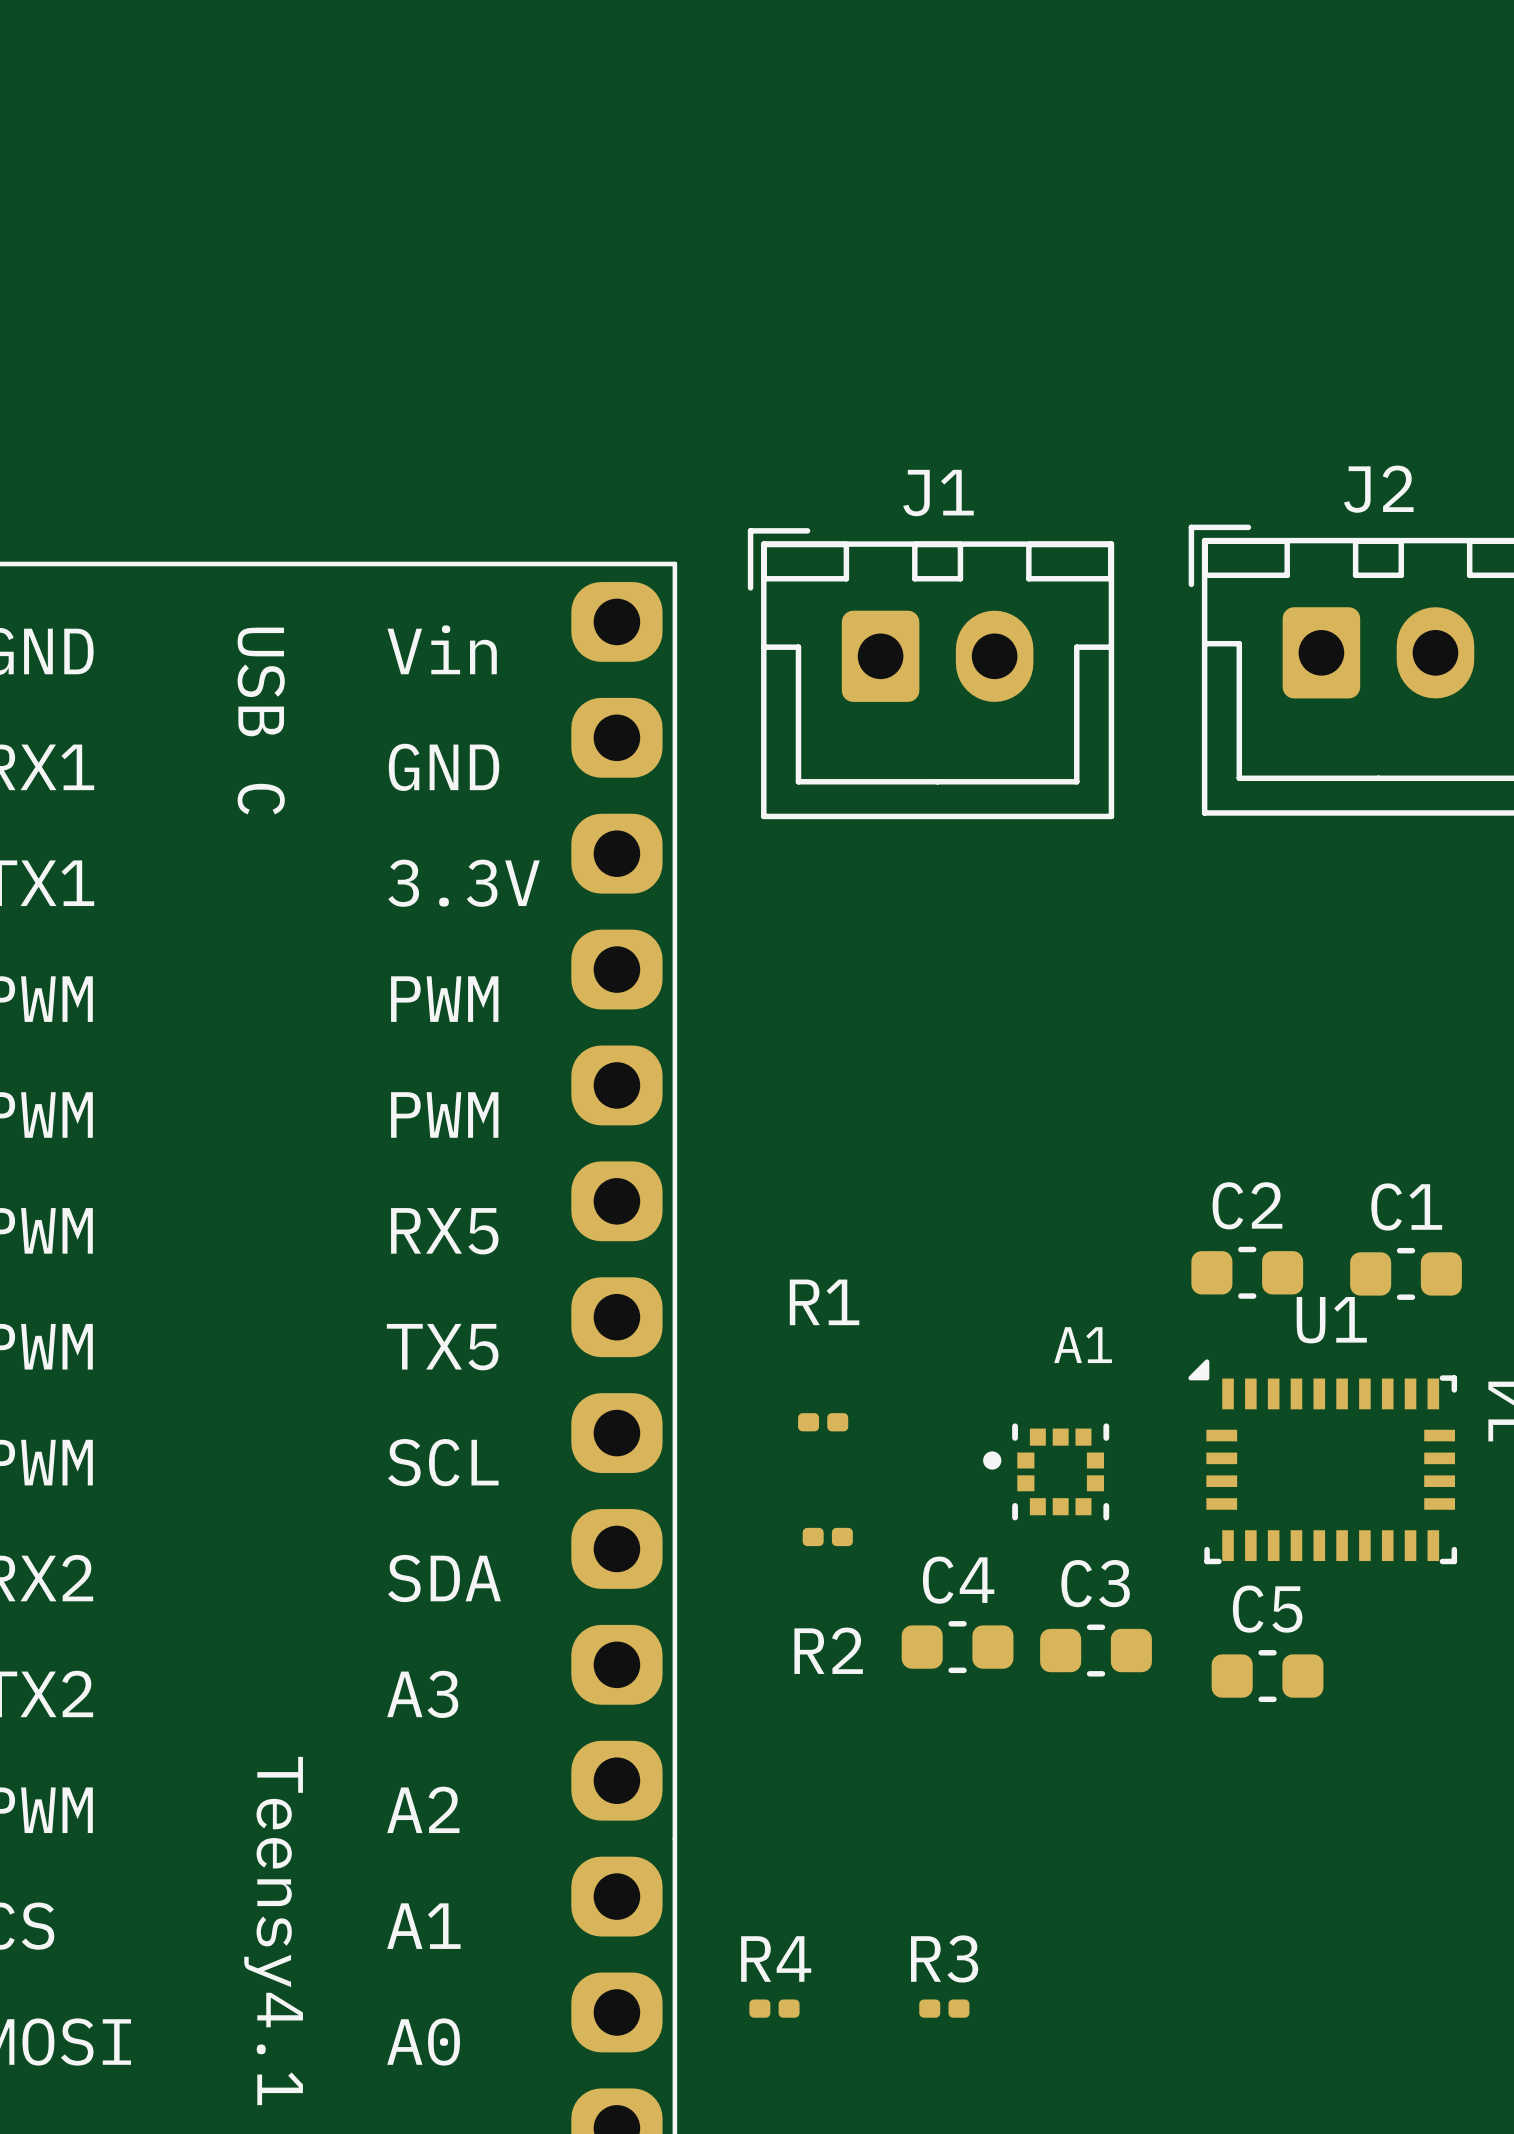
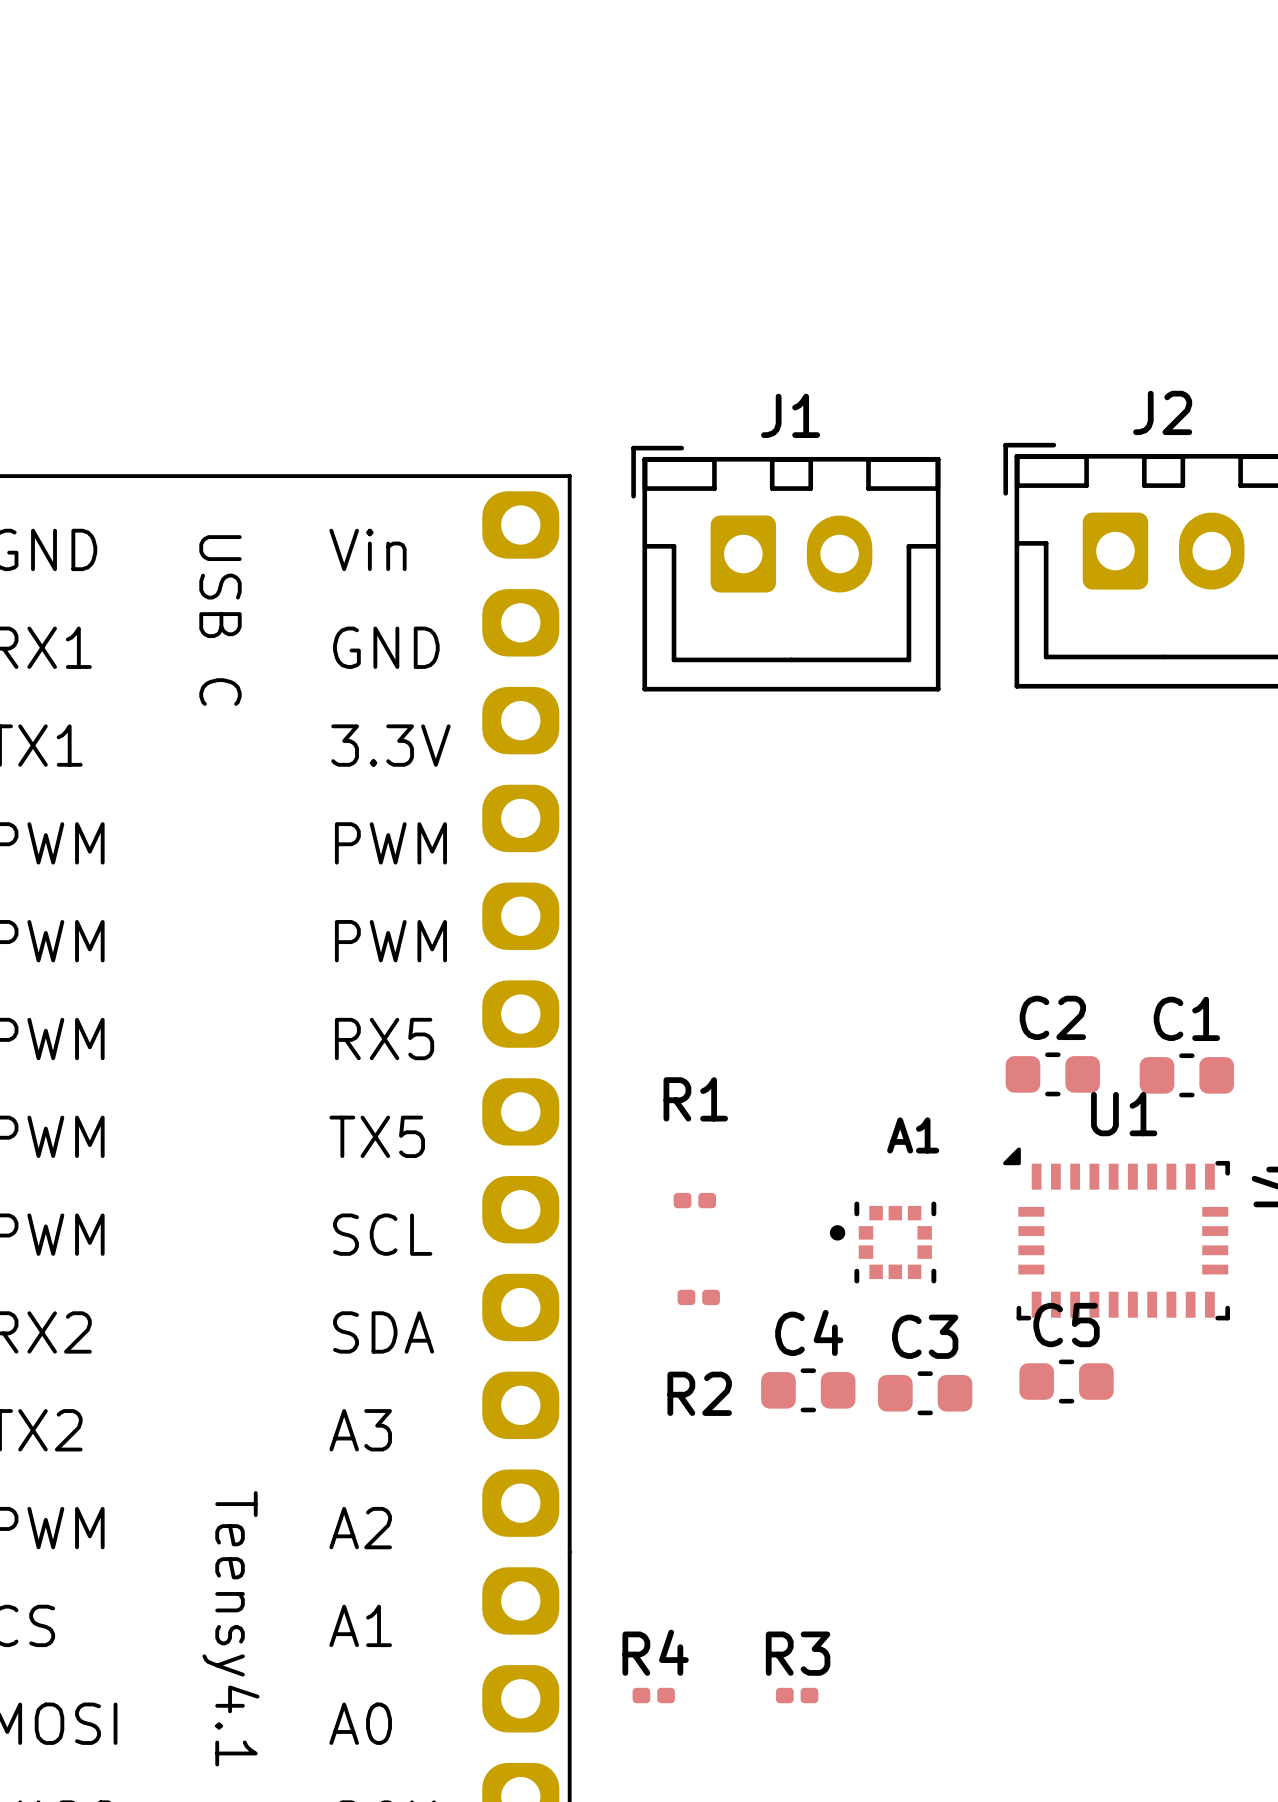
C5 position: (1267, 1676) -> (1066, 1381)

